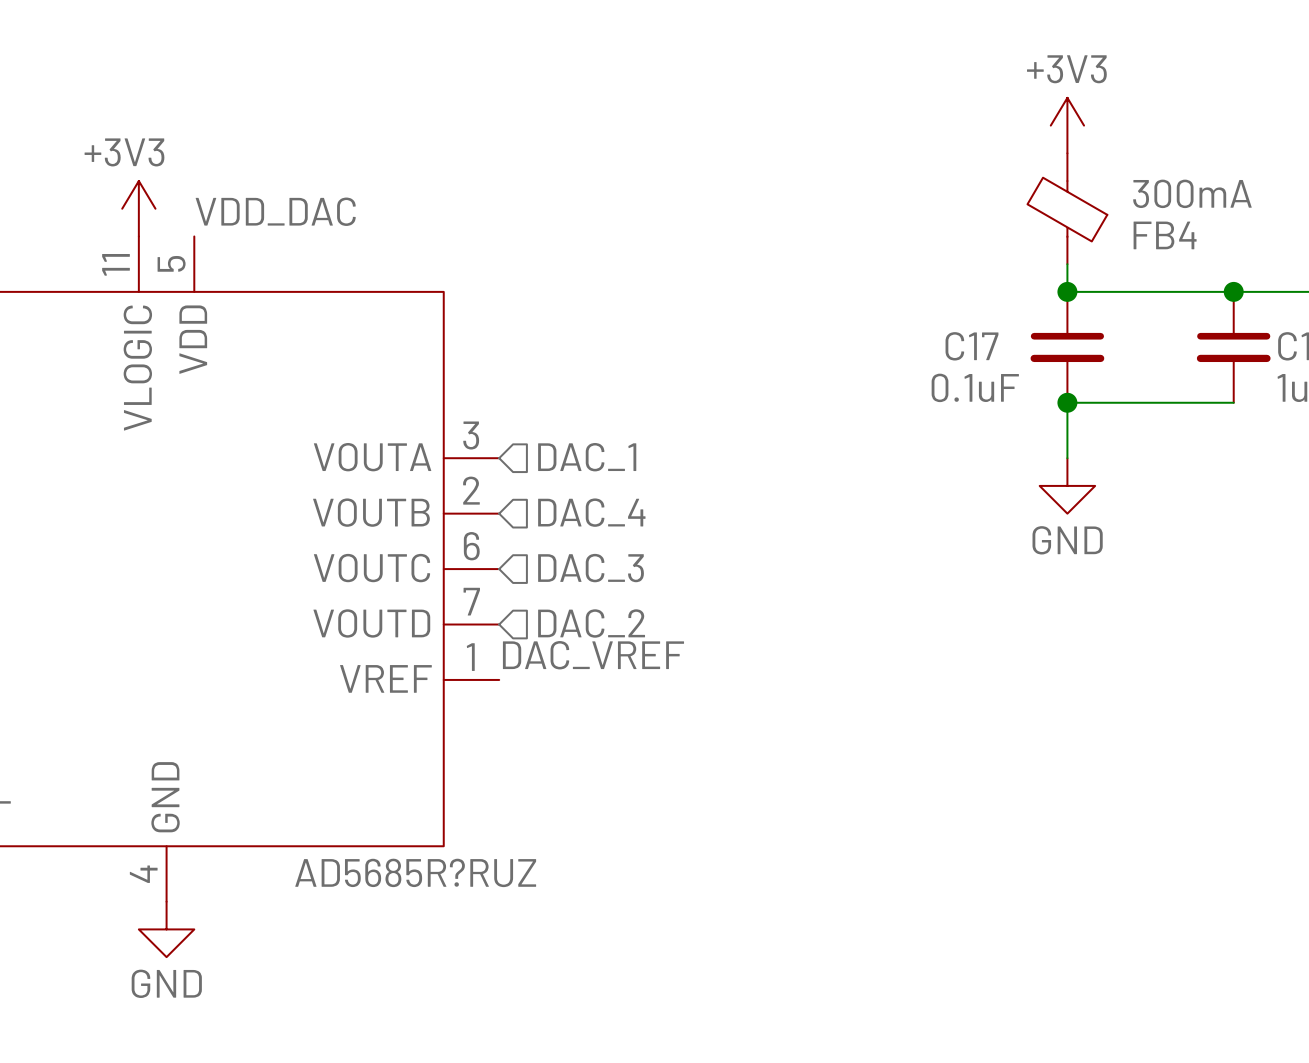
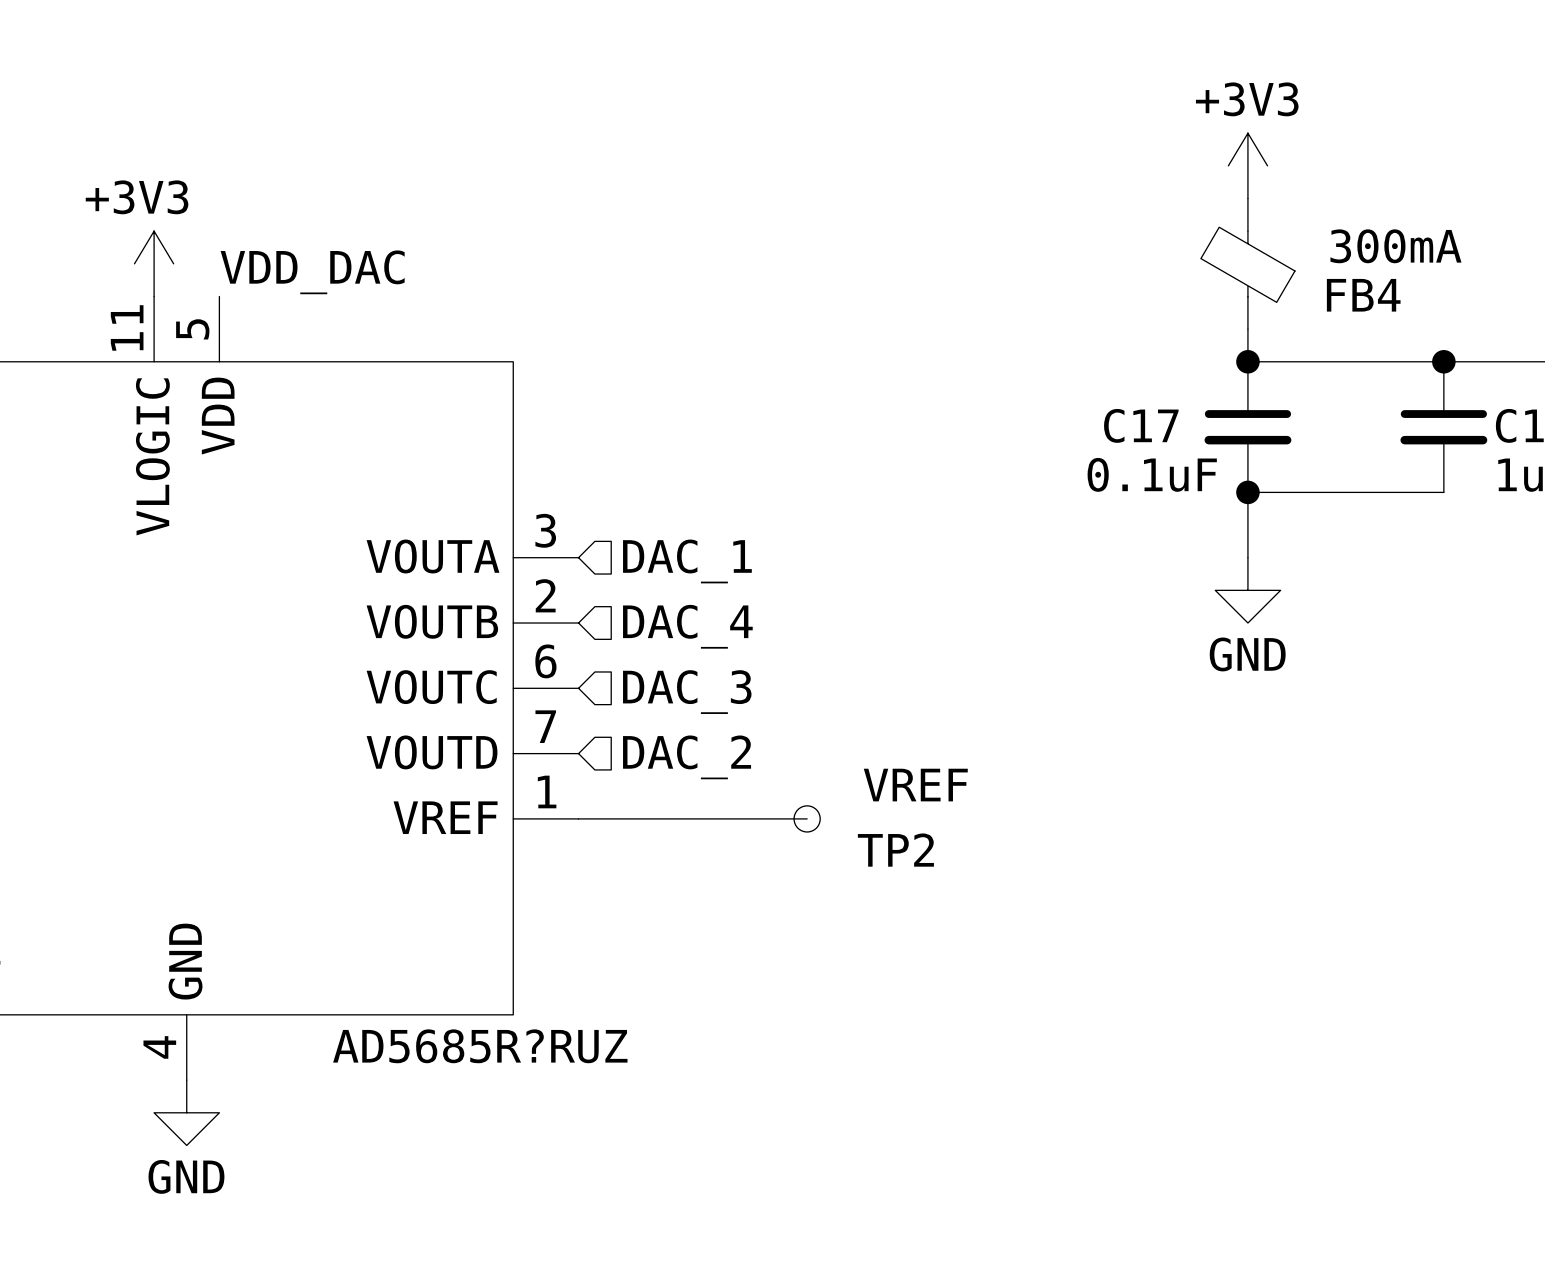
label: DAC_VREF (593, 655) -> none
wire: none -> (578, 818) (807, 818)
TP2: none -> VREF (807, 818)

